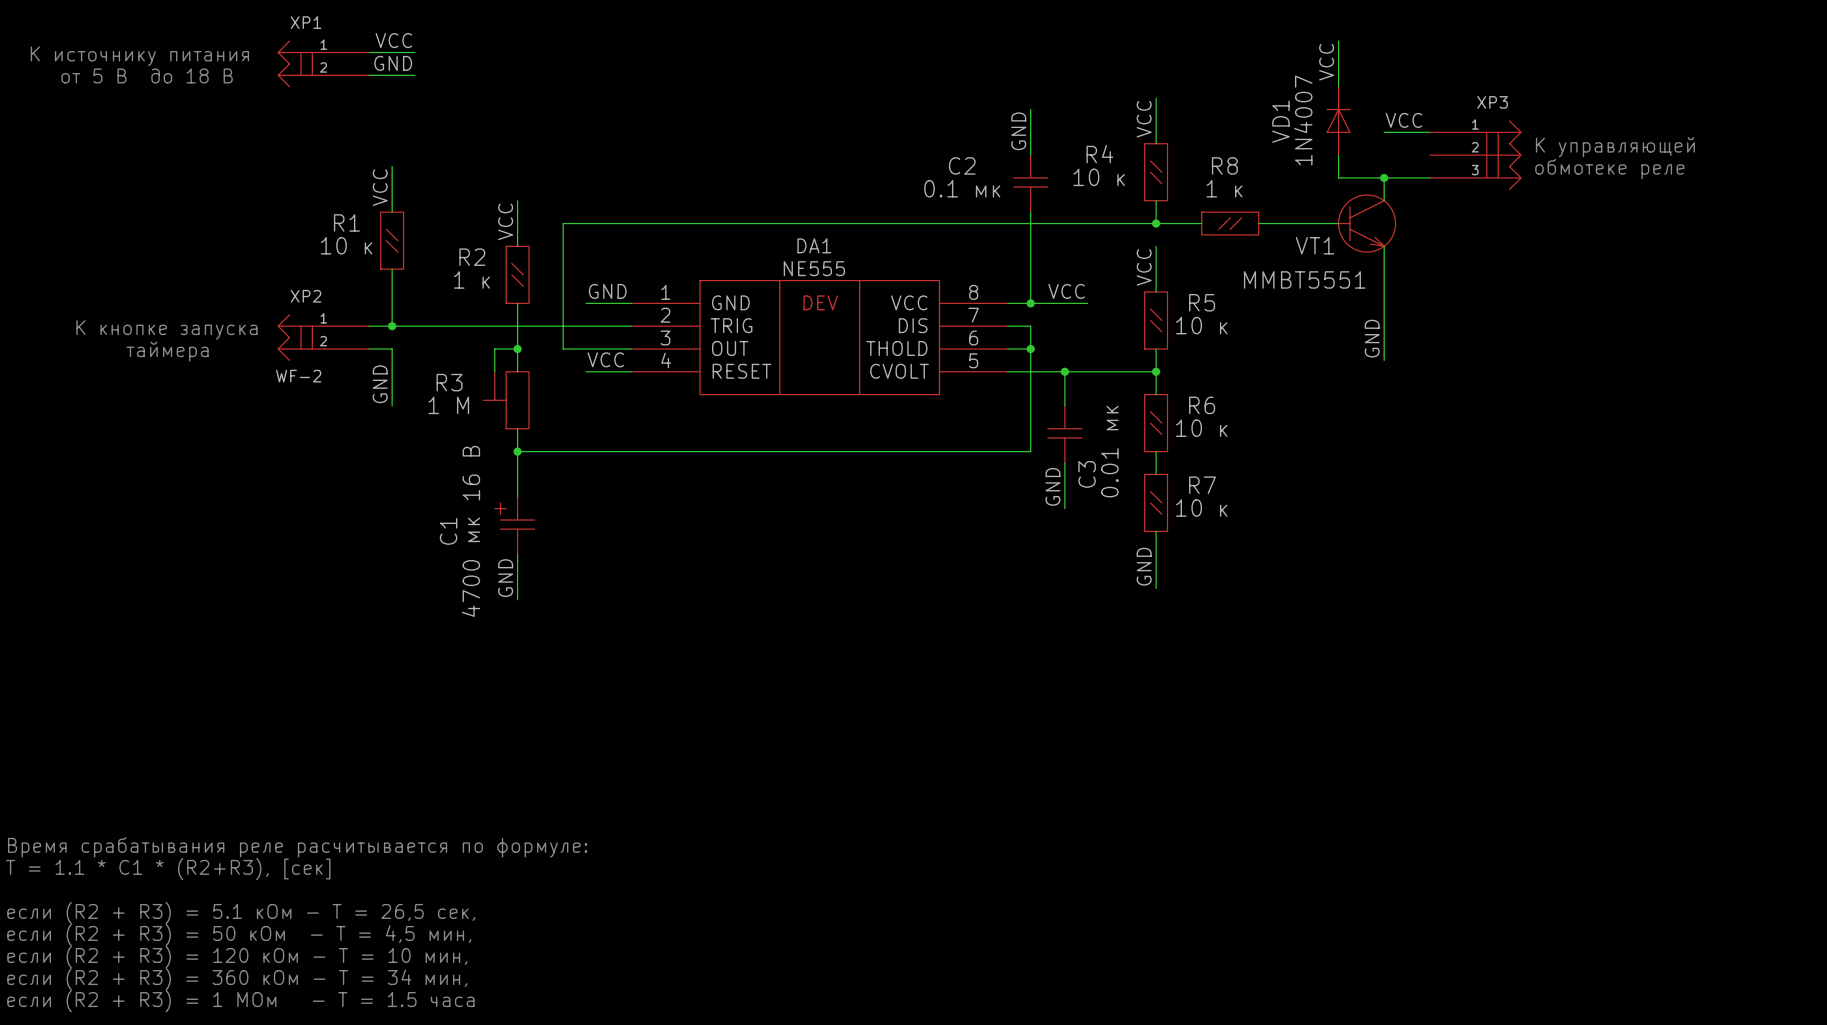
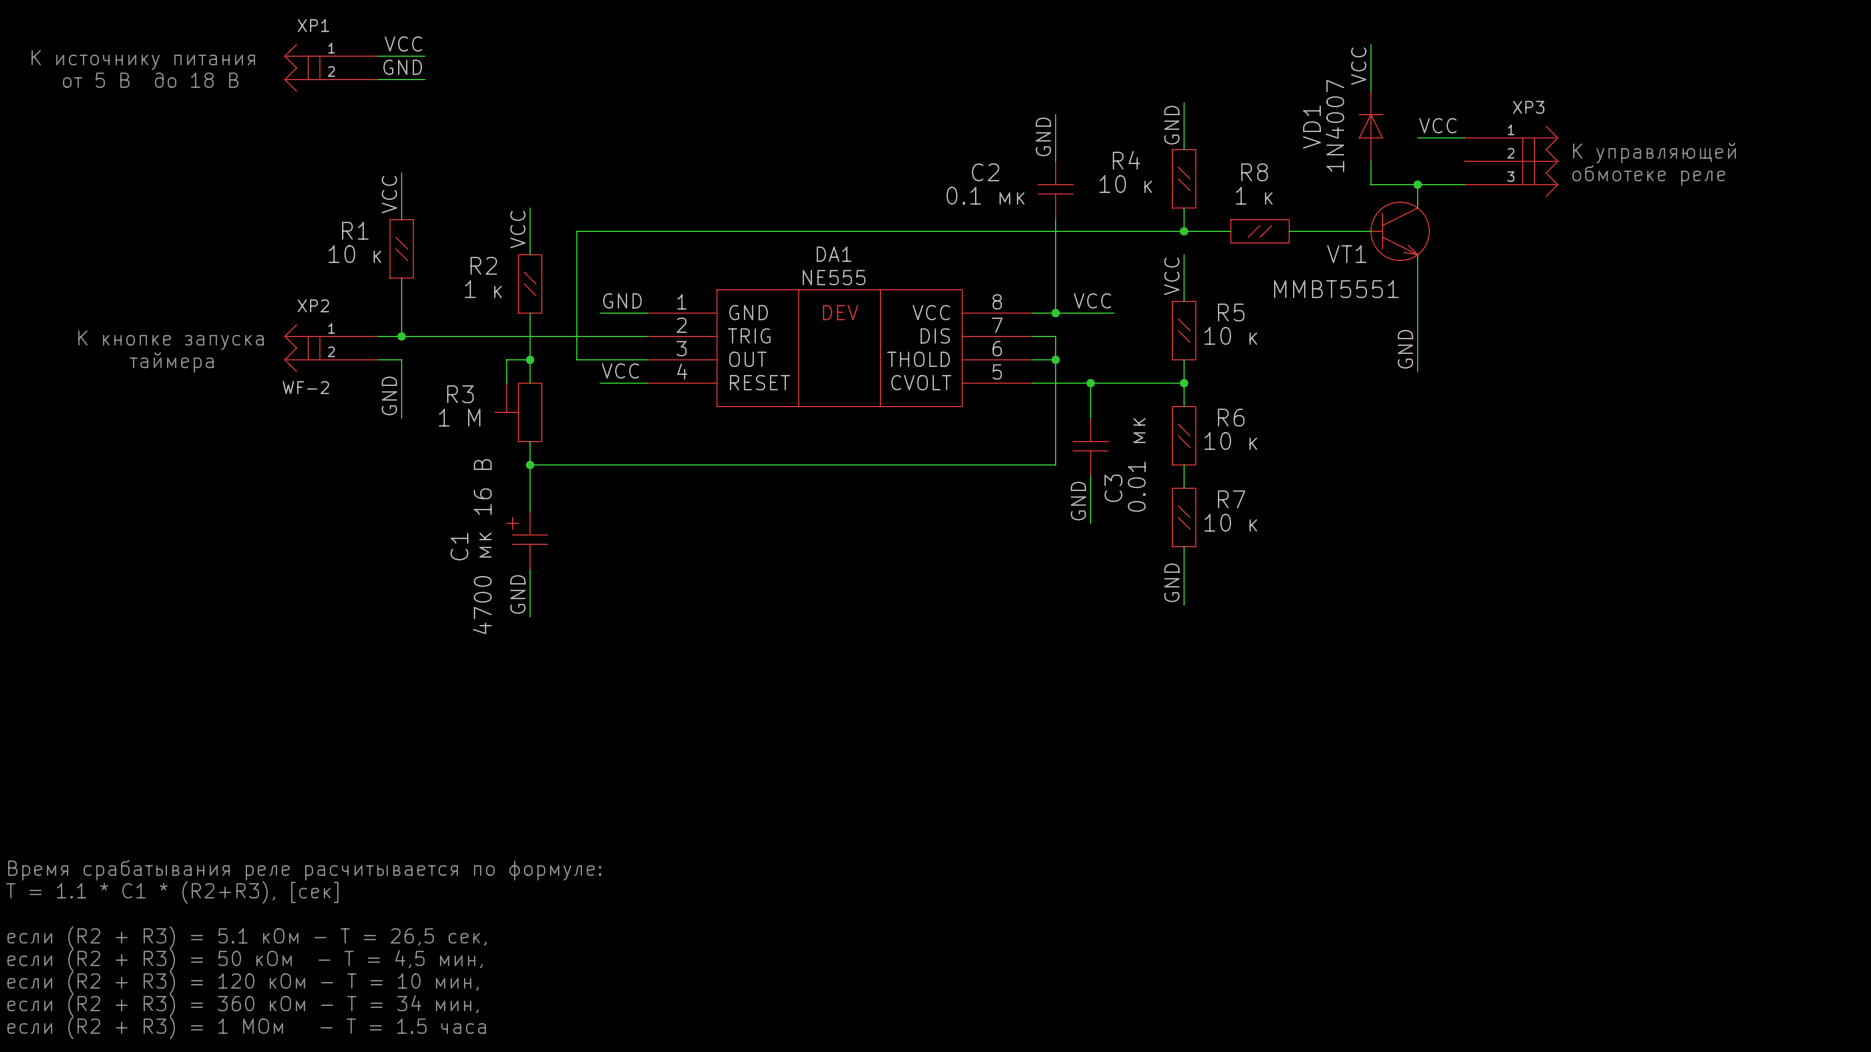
label: VCC (1144, 119) -> GND (1171, 125)

